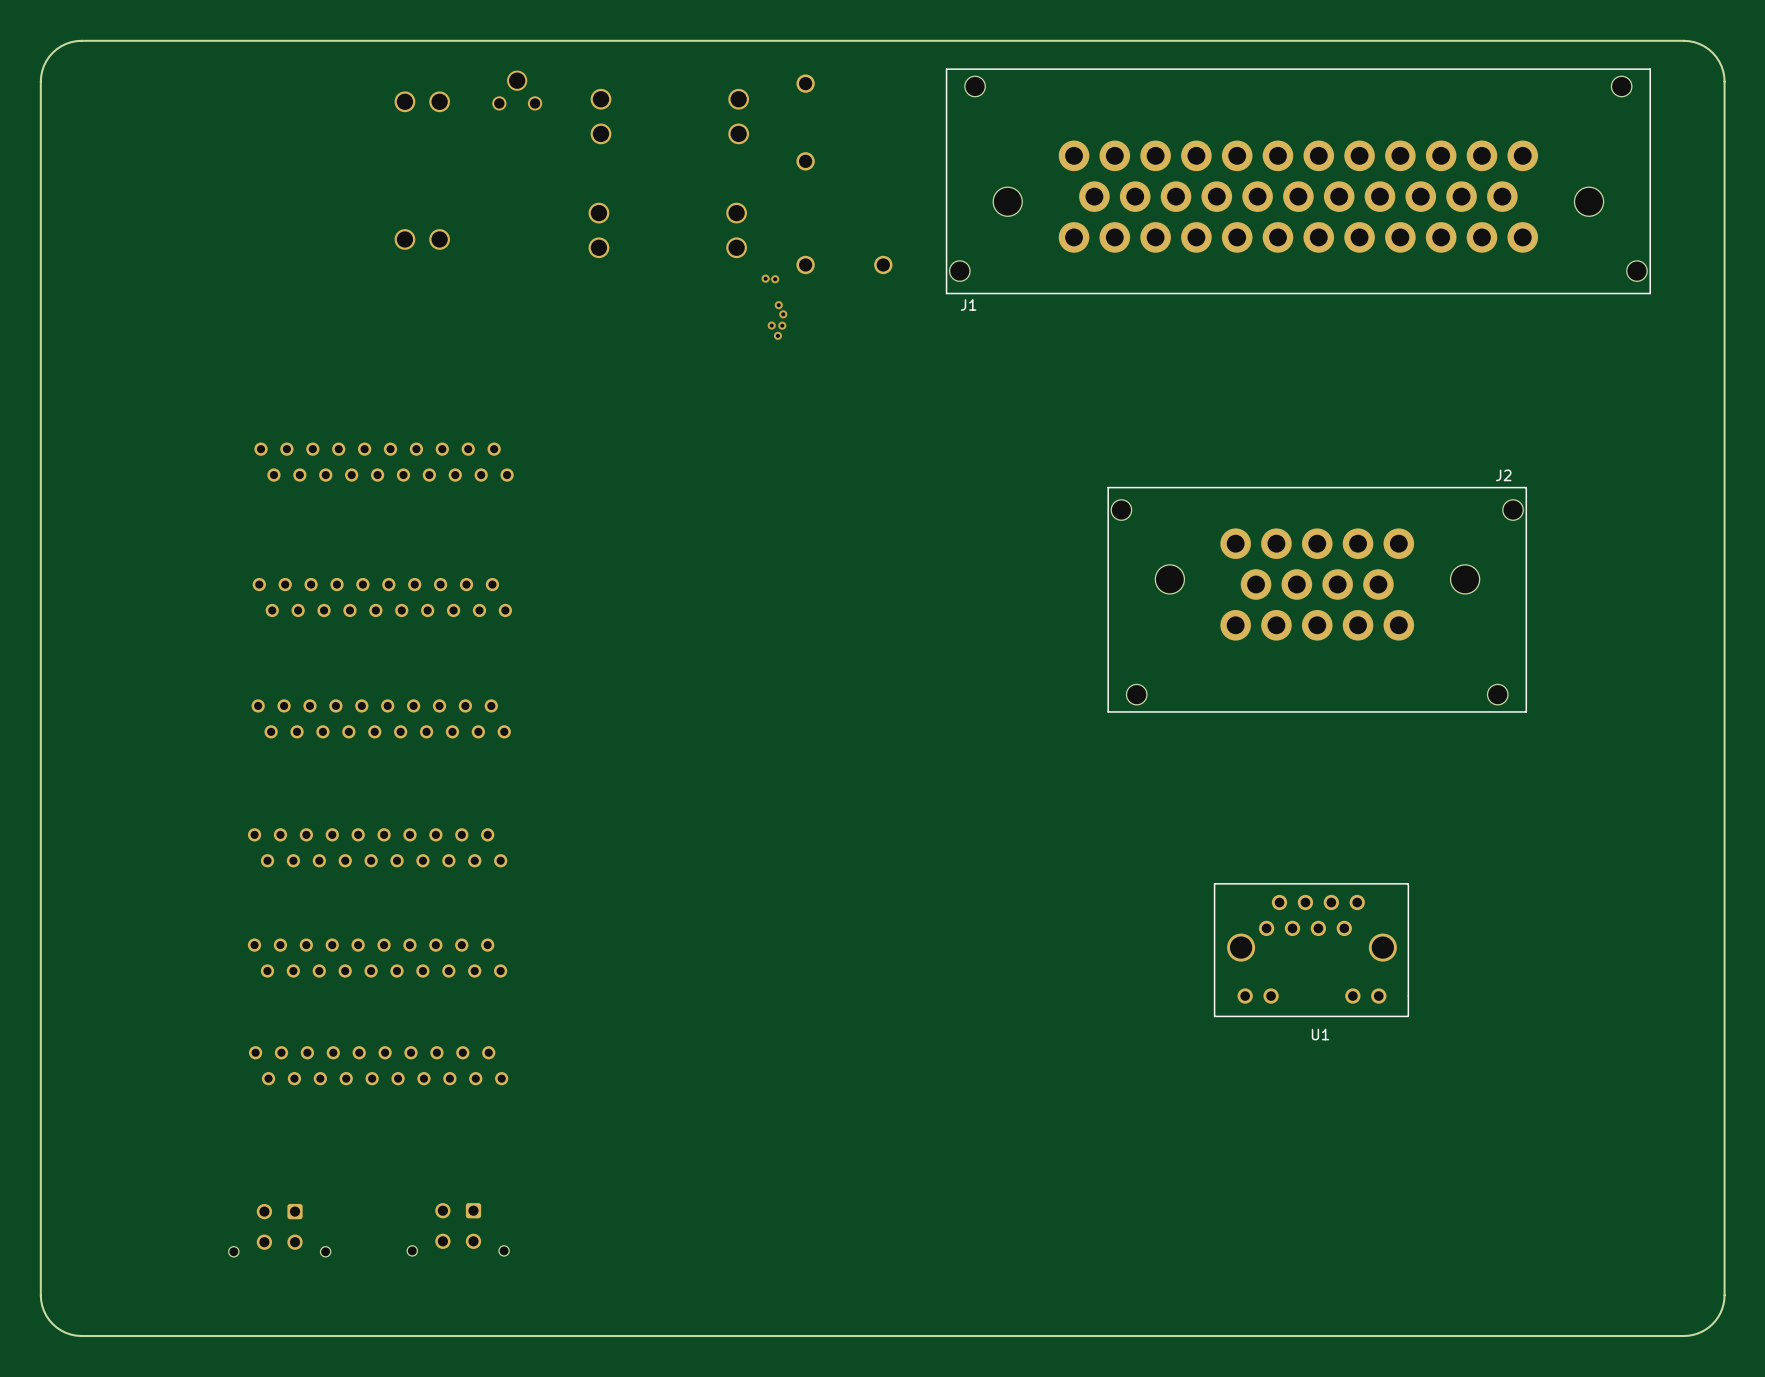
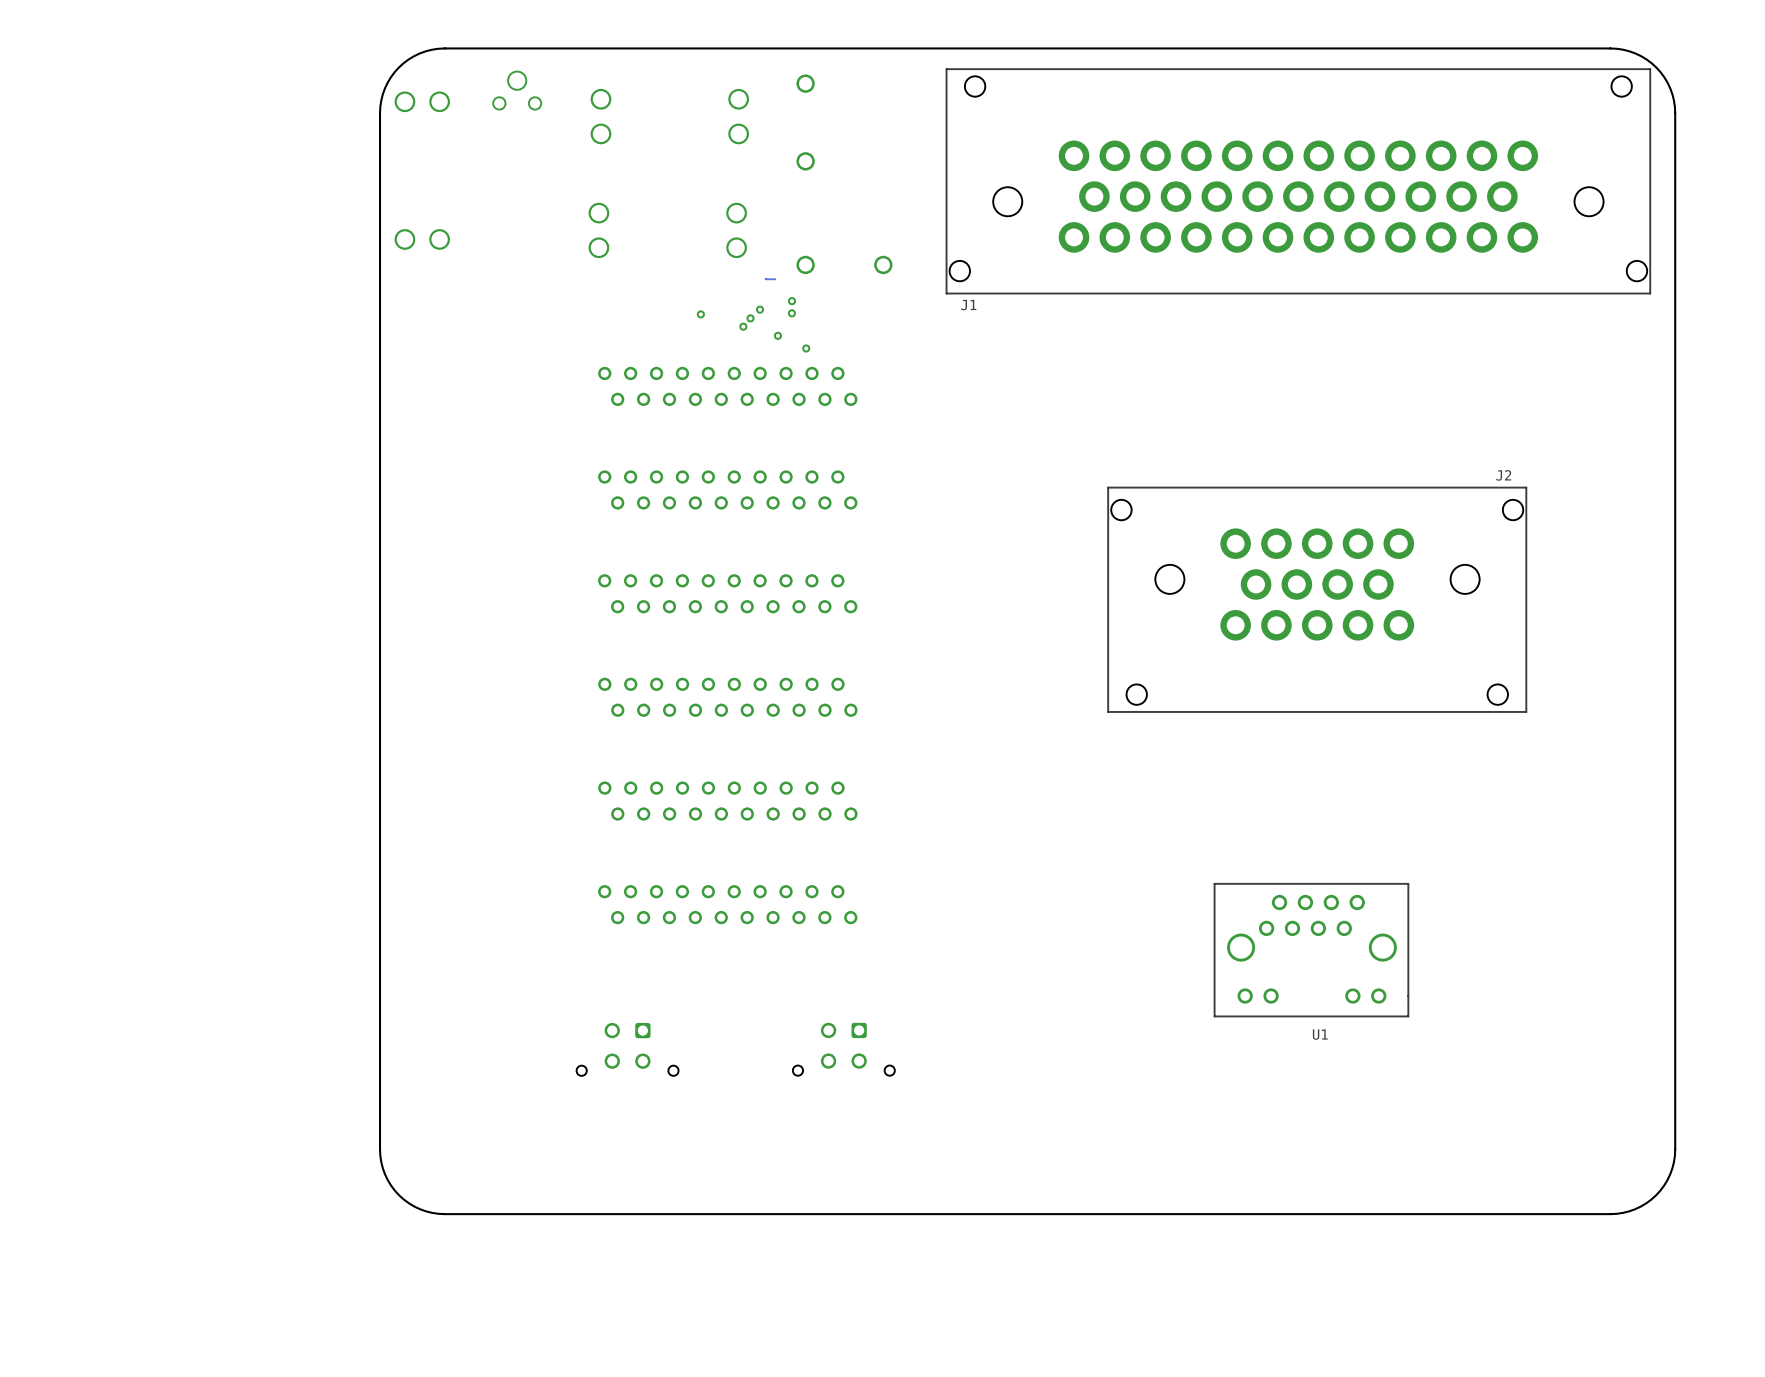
board edge: (1683, 40) (81, 40) (66, 43) (56, 49) (46, 61) (40, 81) (40, 1295) (43, 1310) (49, 1320) (61, 1330) (81, 1336) (1683, 1336) (1697, 1333) (1709, 1327) (1720, 1312) (1724, 1295) (1724, 81) (1721, 66) (1712, 52) (1699, 43) (1683, 40) -> (1610, 48) (1635, 53) (1656, 67) (1670, 88) (1675, 113) (1675, 1149) (1670, 1174) (1656, 1195) (1635, 1209) (1610, 1214) (444, 1214) (420, 1209) (398, 1195) (384, 1174) (380, 1149) (380, 113) (384, 88) (398, 67) (420, 53) (444, 48) (1610, 48)
via: (765, 278) -> none
via: (775, 279) -> none
via: none -> (791, 301)
via: (778, 305) -> none
via: none -> (760, 309)
via: none -> (791, 313)
via: none -> (700, 314)
via: (783, 314) -> none
via: none -> (750, 318)
via: (771, 325) -> none
via: (782, 325) -> none
via: none -> (743, 326)
via: none -> (806, 348)
part: none -> (727, 386)
part: (384, 462) -> none
part: none -> (727, 489)
part: none -> (727, 593)
part: (382, 597) -> none
part: none -> (727, 697)
part: (381, 718) -> none
part: none -> (727, 801)
part: (377, 847) -> none
part: none -> (727, 904)
part: (377, 958) -> none
part: none -> (627, 1049)
part: none -> (843, 1049)
part: (378, 1065) -> none
part: (458, 1229) -> none
part: (279, 1230) -> none

